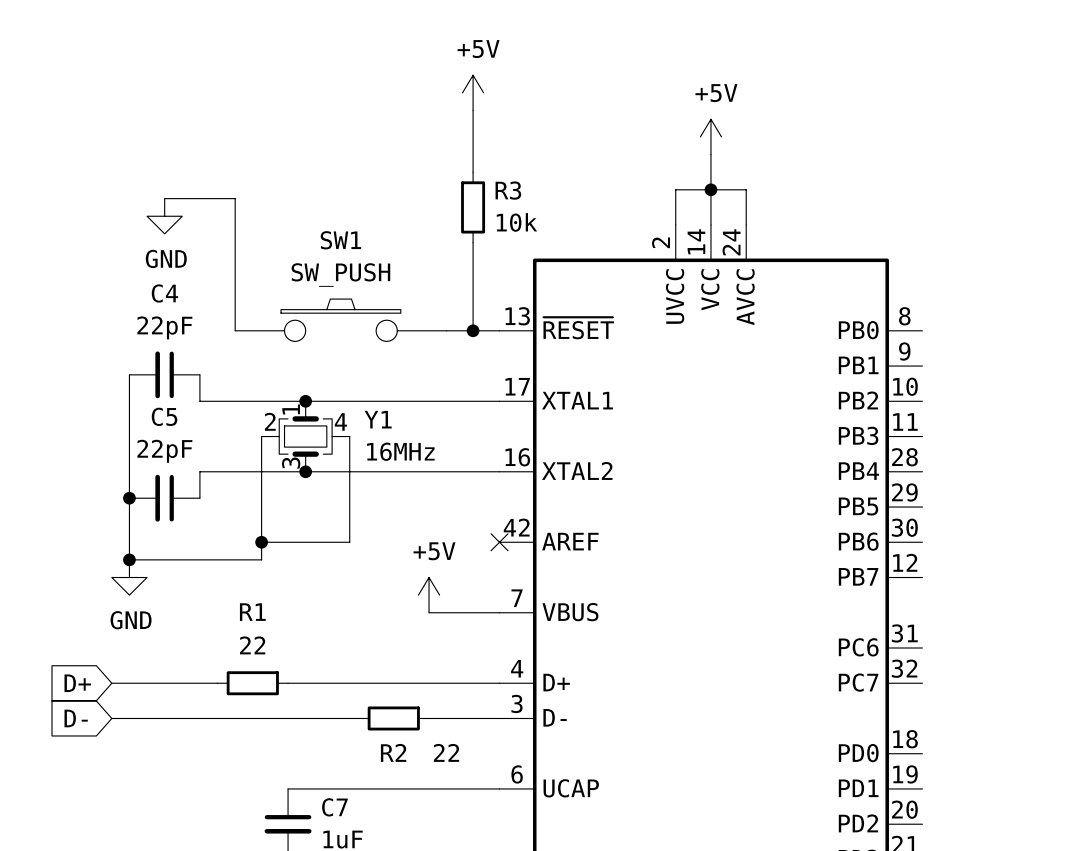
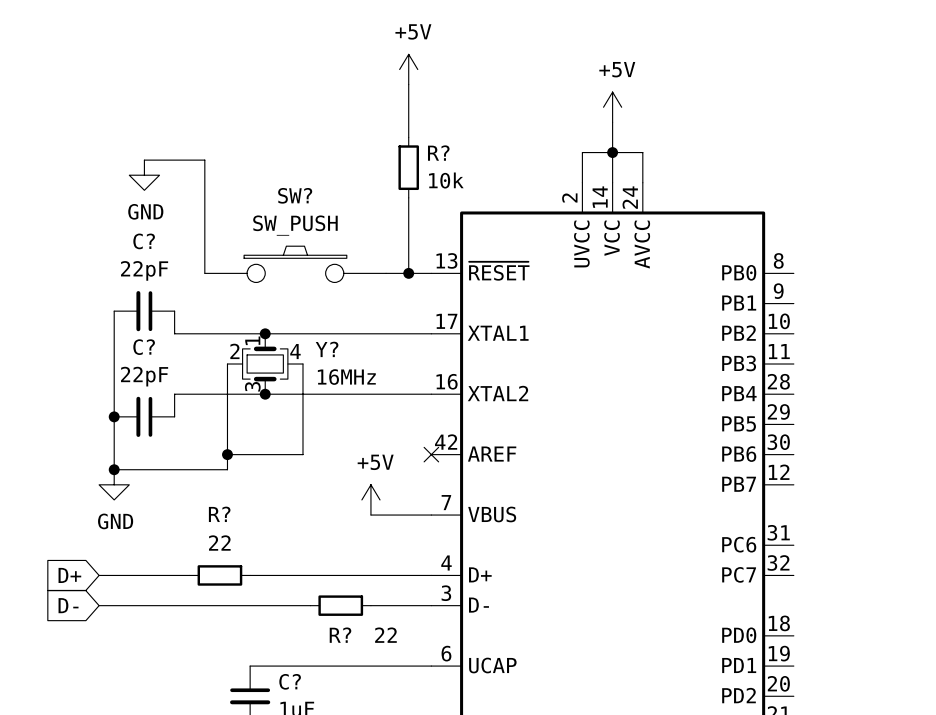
R3 name: R3 (508, 190) -> R? (438, 153)
SW1 name: SW1 (340, 240) -> SW? (295, 195)
C4 name: C4 (164, 293) -> C? (144, 241)
C5 name: C5 (164, 416) -> C? (144, 347)
Y1 name: Y1 (378, 419) -> Y? (327, 349)
R1 name: R1 (252, 612) -> R? (219, 514)
R2 name: R2 (393, 752) -> R? (340, 635)
C7 name: C7 (334, 807) -> C? (290, 681)

